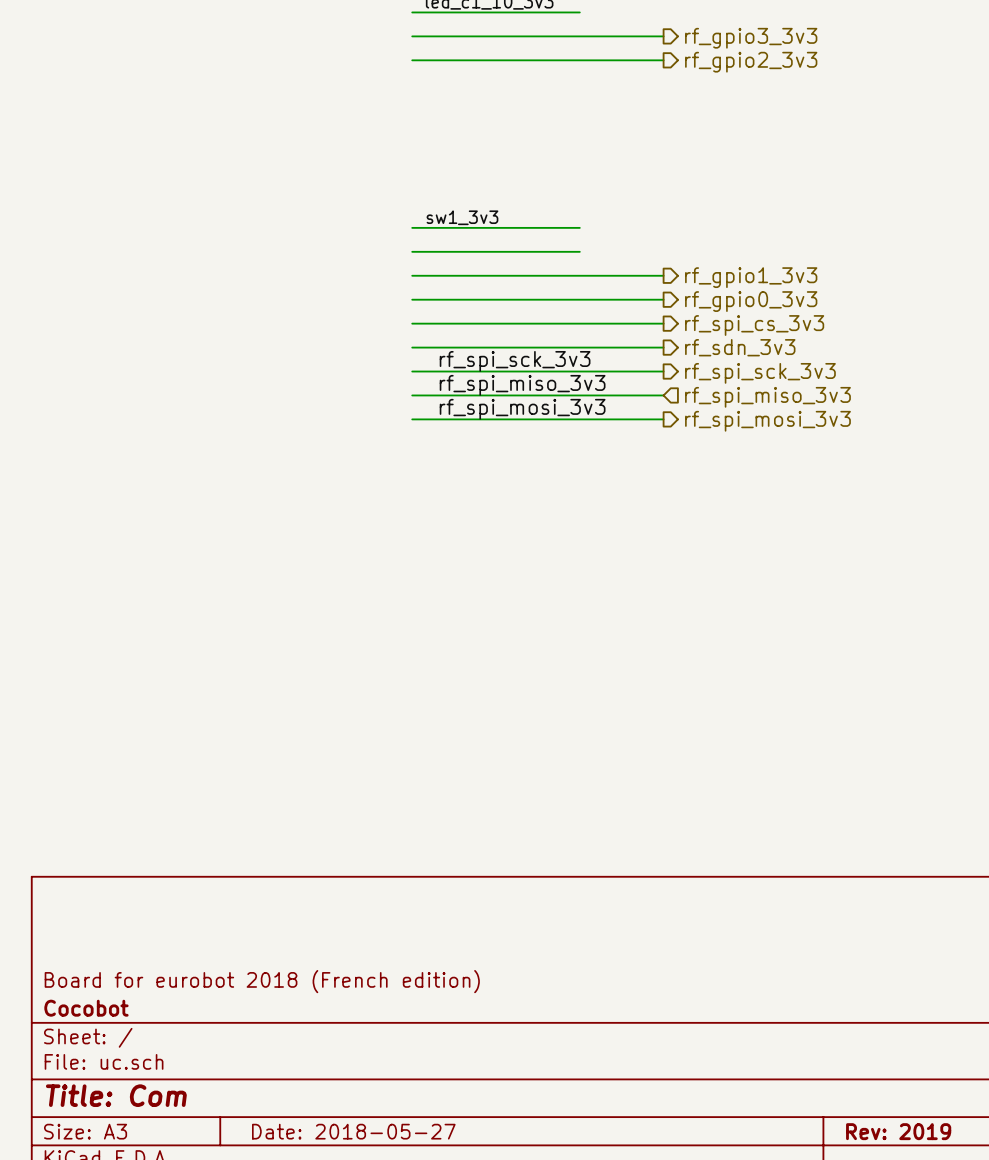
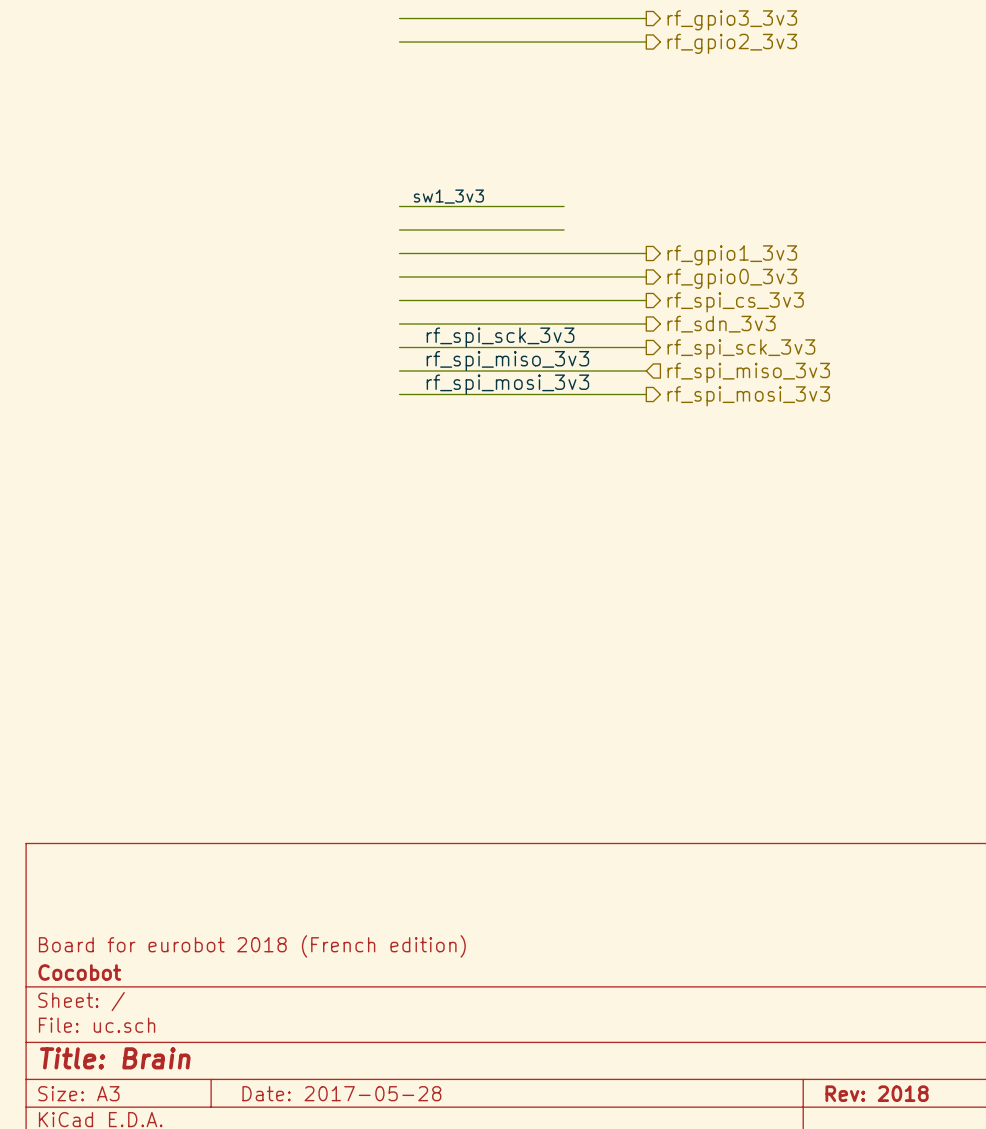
title block: Title: Com (116, 1095) -> Title: Brain (115, 1058)
title block: Date: 2018-05-27 (353, 1131) -> Date: 2017-05-28 (341, 1093)
title block: Rev: 2019 (898, 1131) -> Rev: 2018 (877, 1093)

